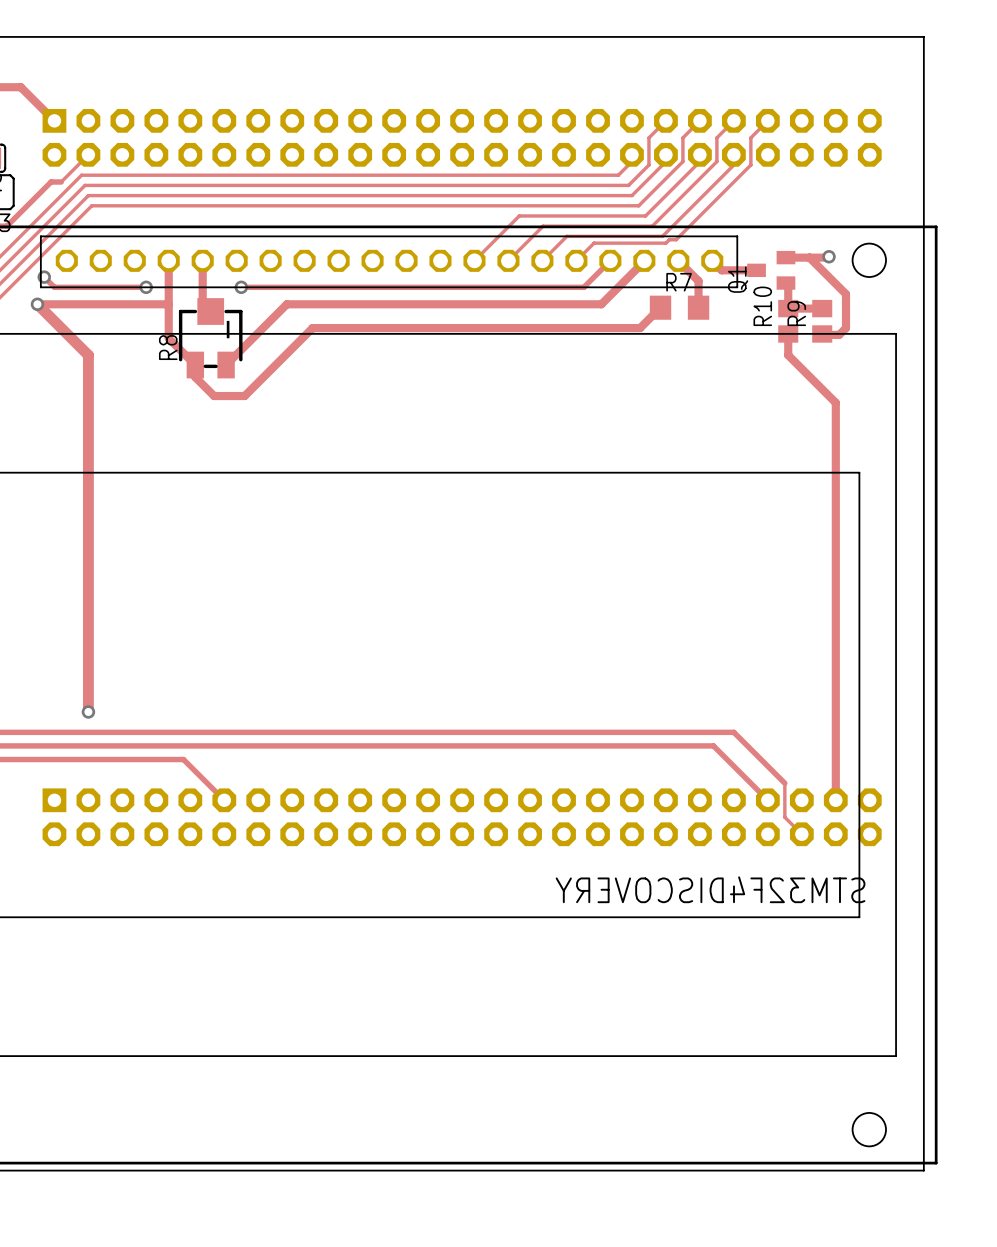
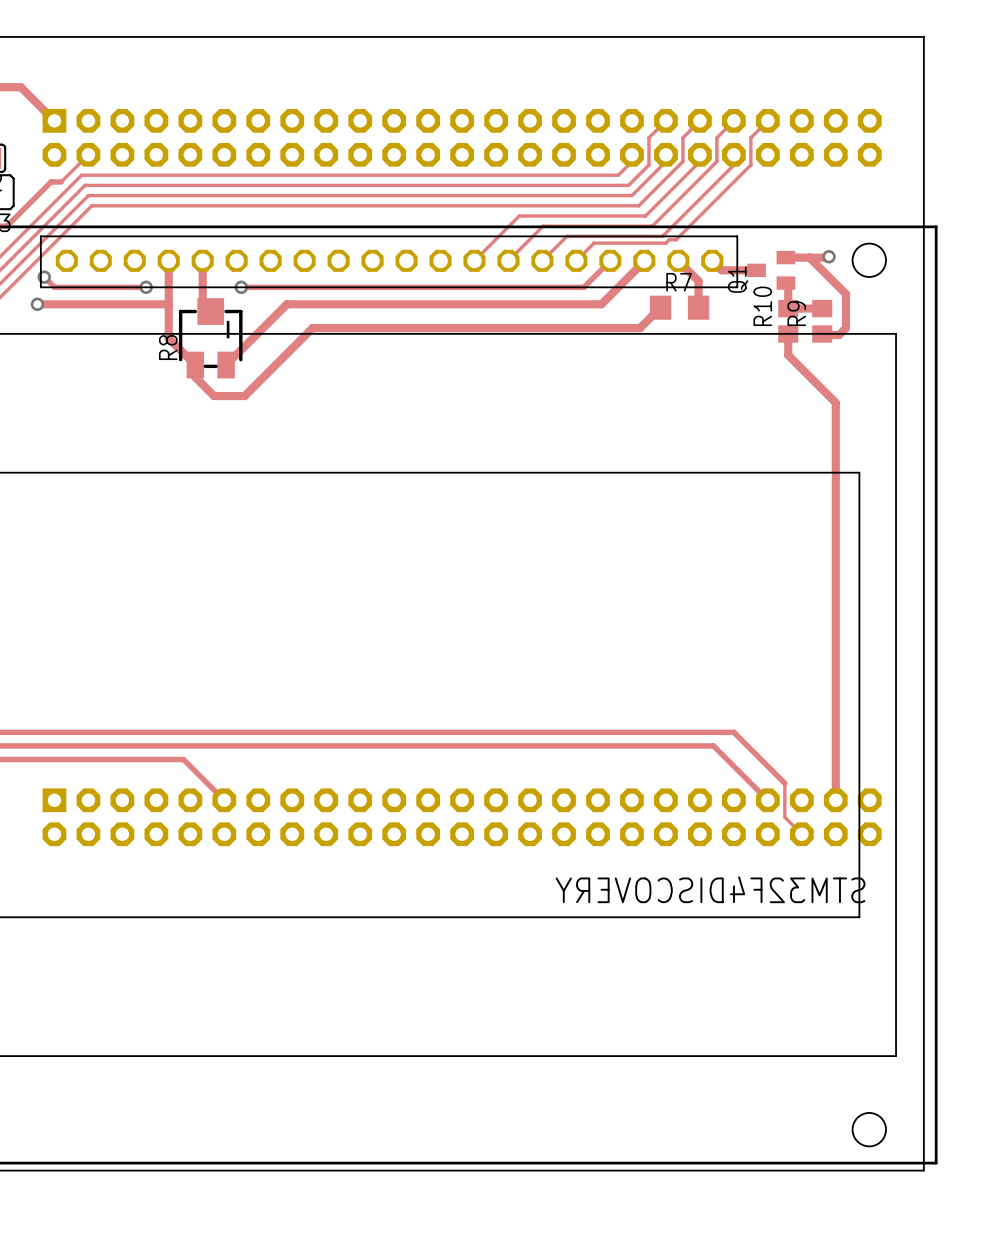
track: (37, 304) (88, 355) (88, 711) -> none
via: (88, 711) -> none

